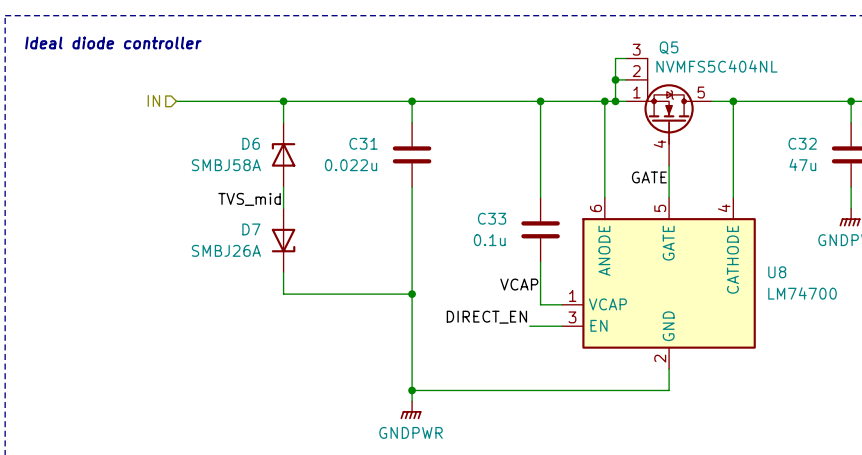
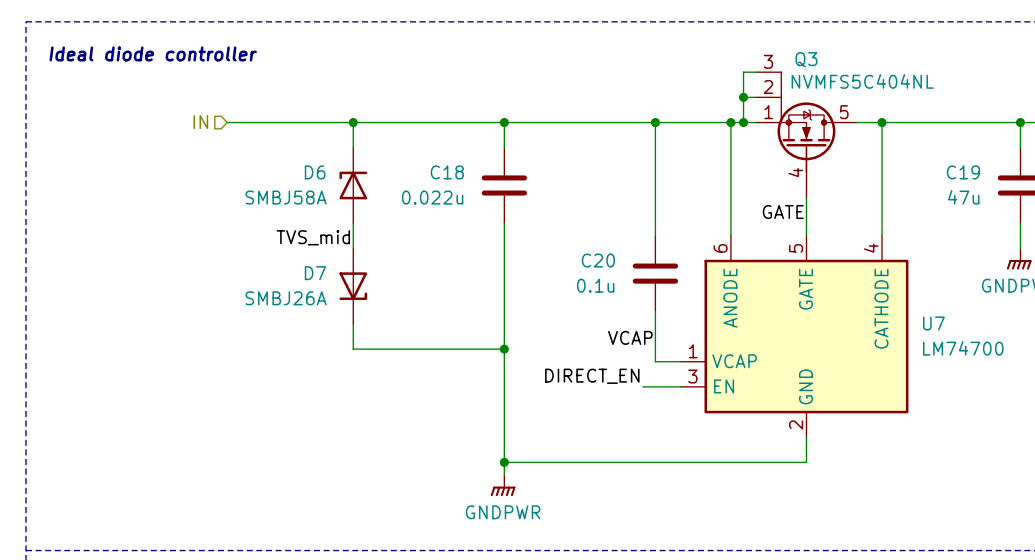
Q5 name: Q5 (669, 47) -> Q3 (806, 59)
C31 name: C31 (363, 143) -> C18 (447, 172)
C32 name: C32 (802, 143) -> C19 (963, 172)
C33 name: C33 (492, 218) -> C20 (598, 260)
U8 name: U8 (777, 272) -> U7 (933, 323)

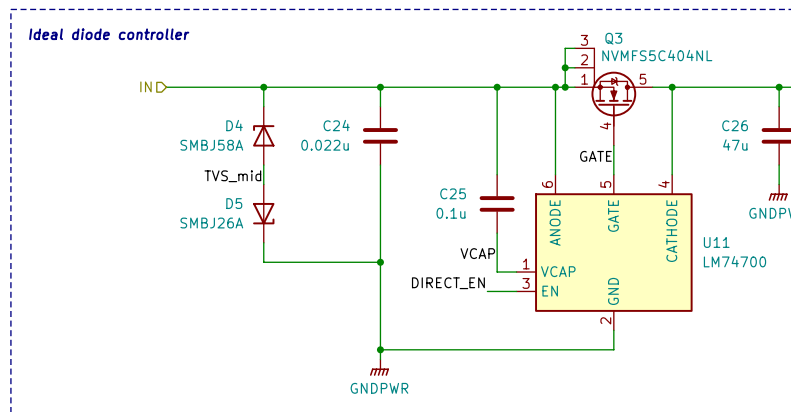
D6 name: D6 (315, 172) -> D4 (234, 125)
C18 name: C18 (447, 172) -> C24 (336, 125)
C19 name: C19 (963, 172) -> C26 (735, 125)
C20 name: C20 (598, 260) -> C25 (453, 193)
D7 name: D7 (315, 273) -> D5 (234, 203)
U7 name: U7 (933, 323) -> U11 (716, 242)

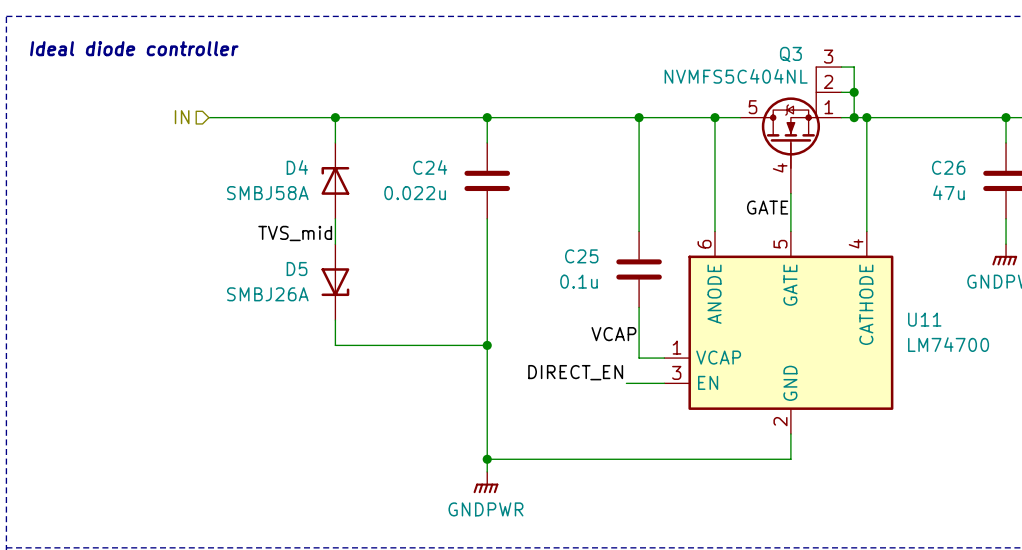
wire: (574, 48) (565, 48) (565, 87) -> none
wire: none -> (841, 67) (854, 67) (854, 117)
wire: (565, 67) (574, 67) -> (841, 92) (854, 92)
junction: (565, 67) -> none
junction: none -> (854, 92)
junction: (565, 87) -> none
Q3 flip: as is (613, 87) -> left-right (790, 117)
junction: none -> (854, 117)

